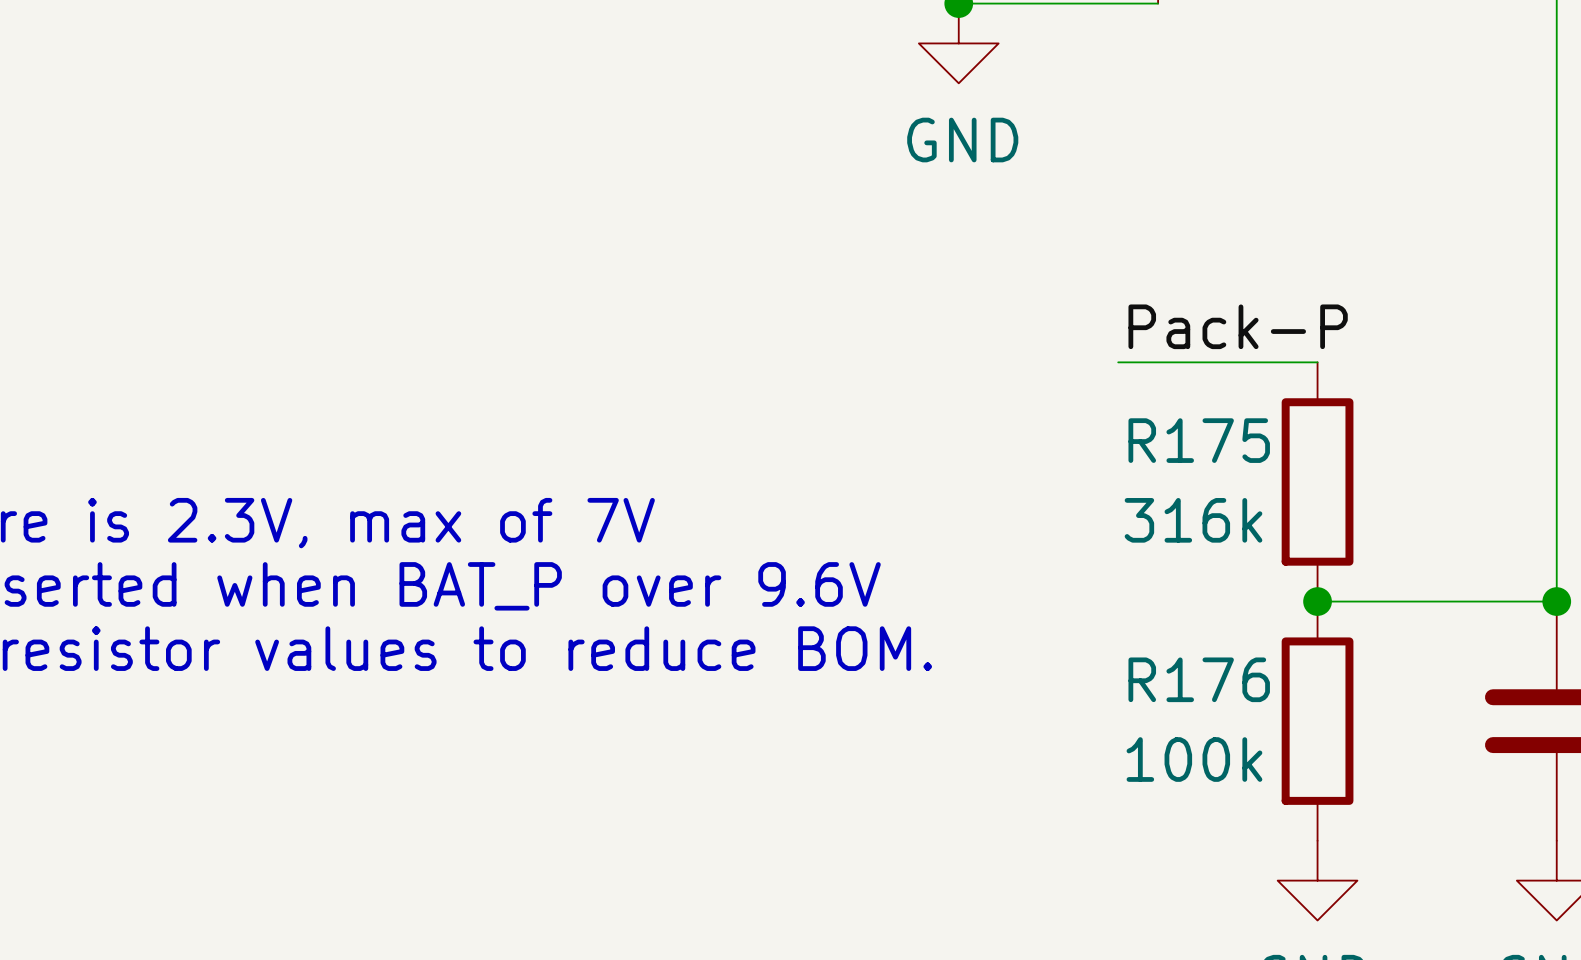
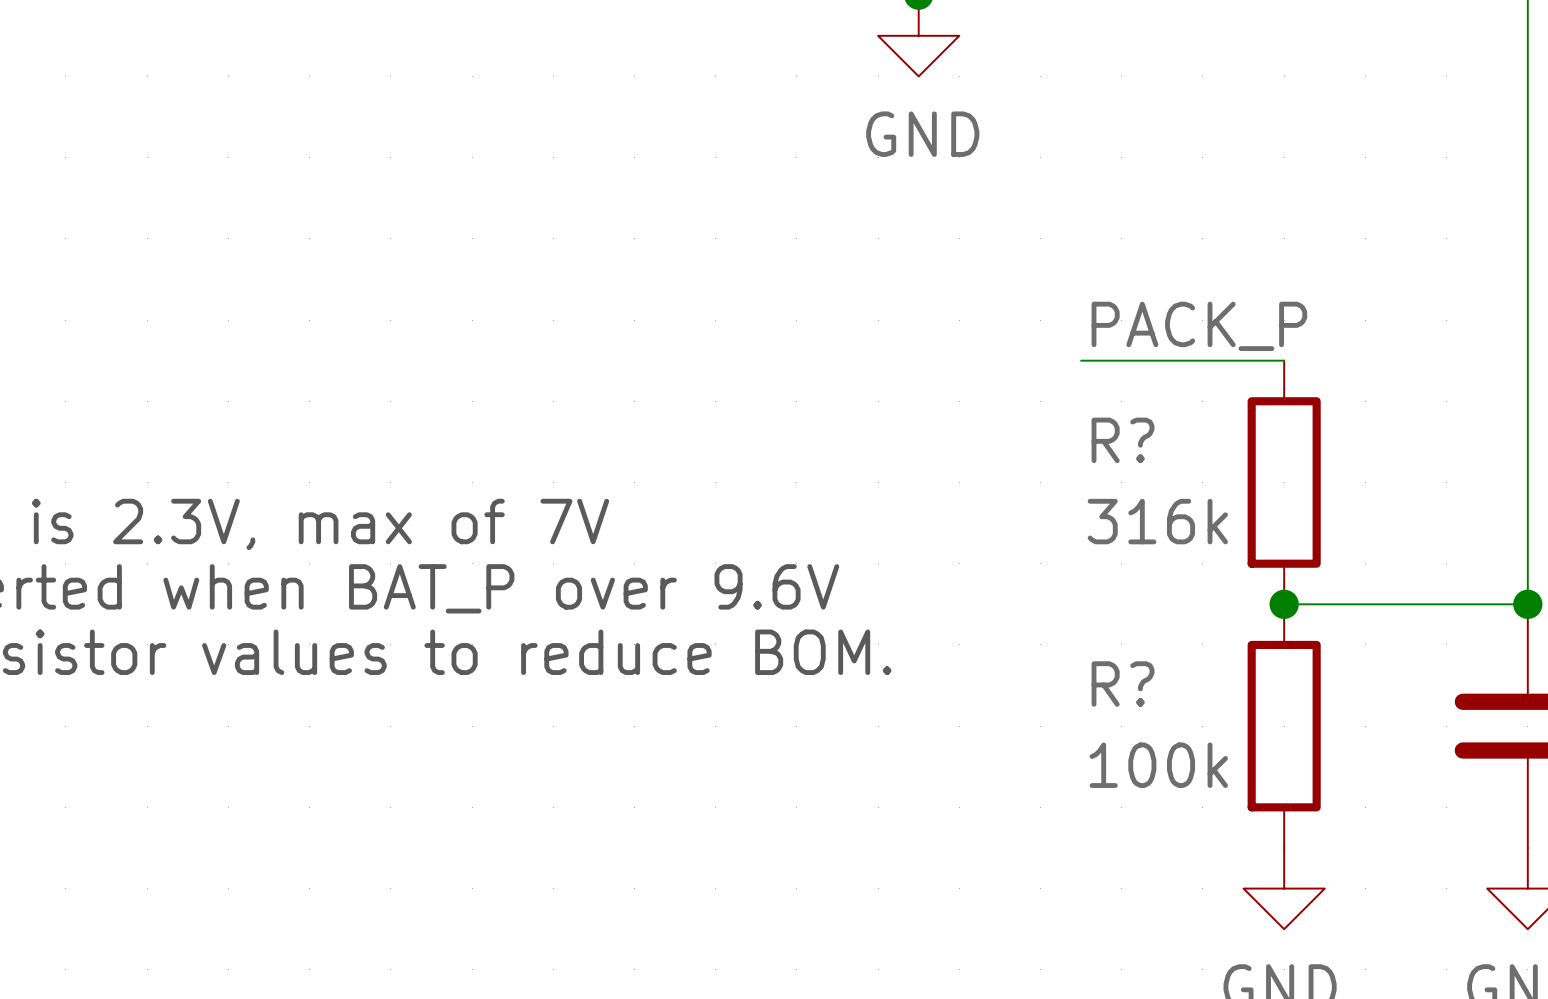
label: Pack-P (1238, 326) -> PACK_P (1199, 326)
R175 name: R175 (1199, 440) -> R? (1123, 440)
R176 name: R176 (1199, 679) -> R? (1123, 684)

